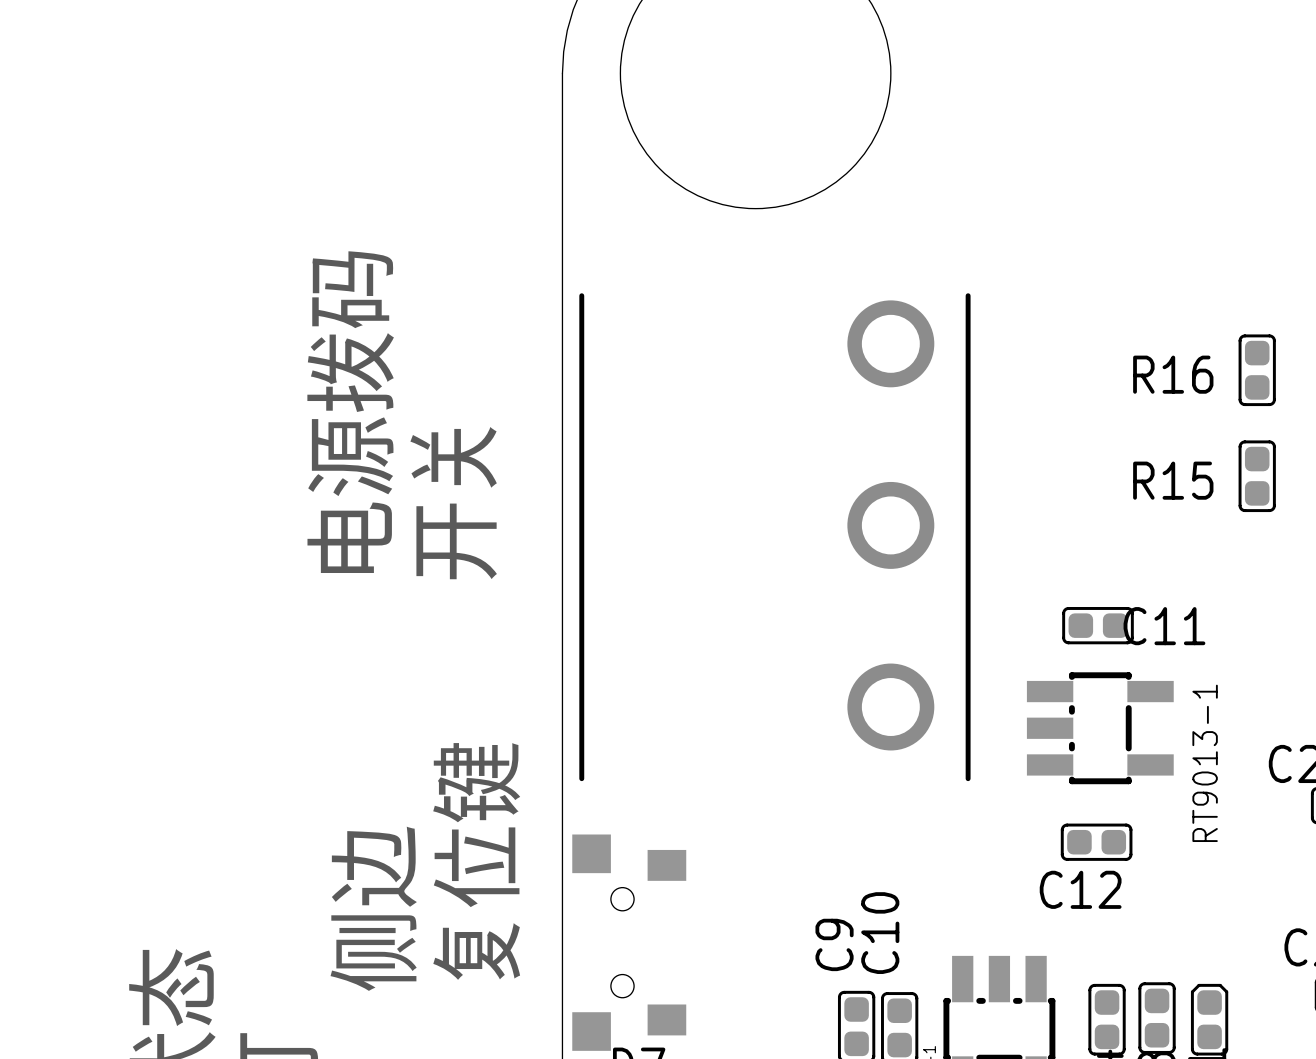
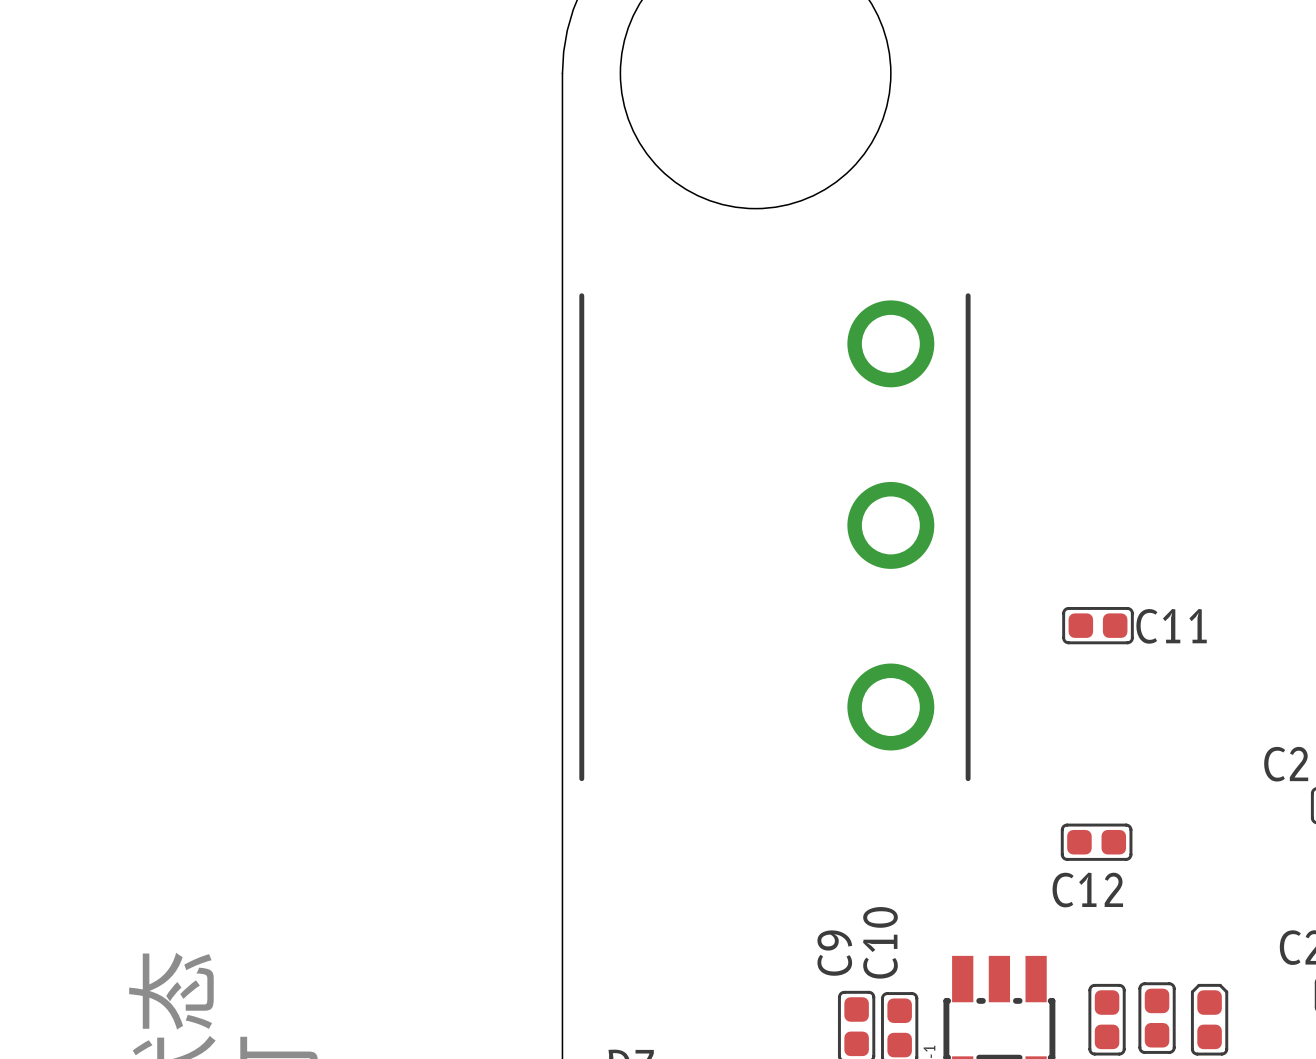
R16: (1257, 370) -> none
text: 电源拨码 (350, 412) -> none
R15: (1257, 476) -> none
text: 开关 (453, 503) -> none
RT9013-1: (1100, 728) -> none
text: 复位键 (476, 861) -> none
text: 侧边 (373, 908) -> none
part: (629, 942) -> none

